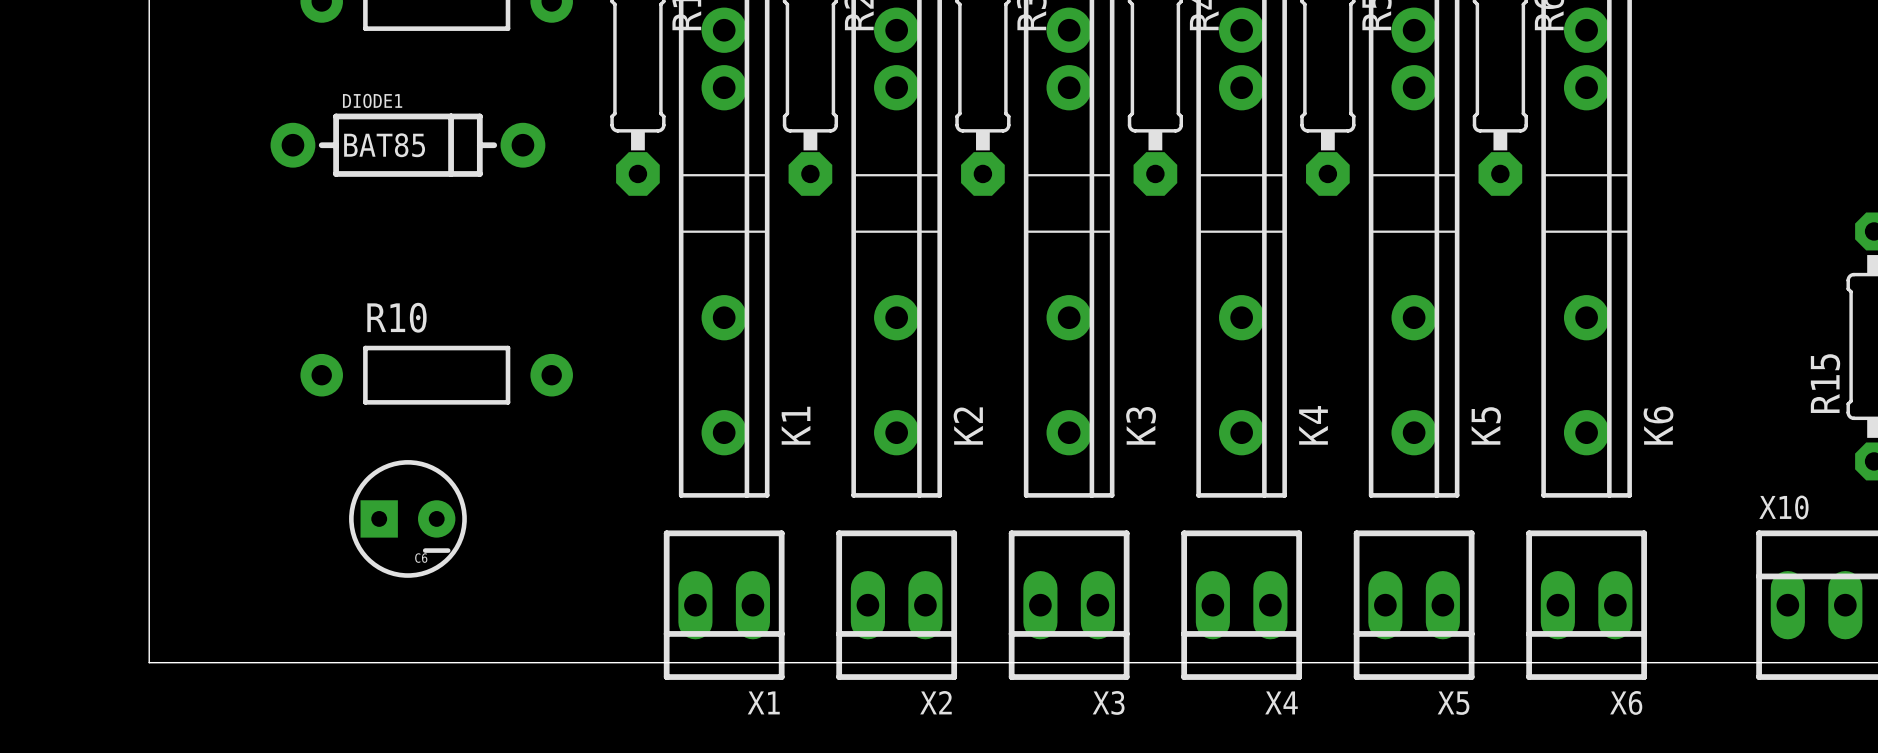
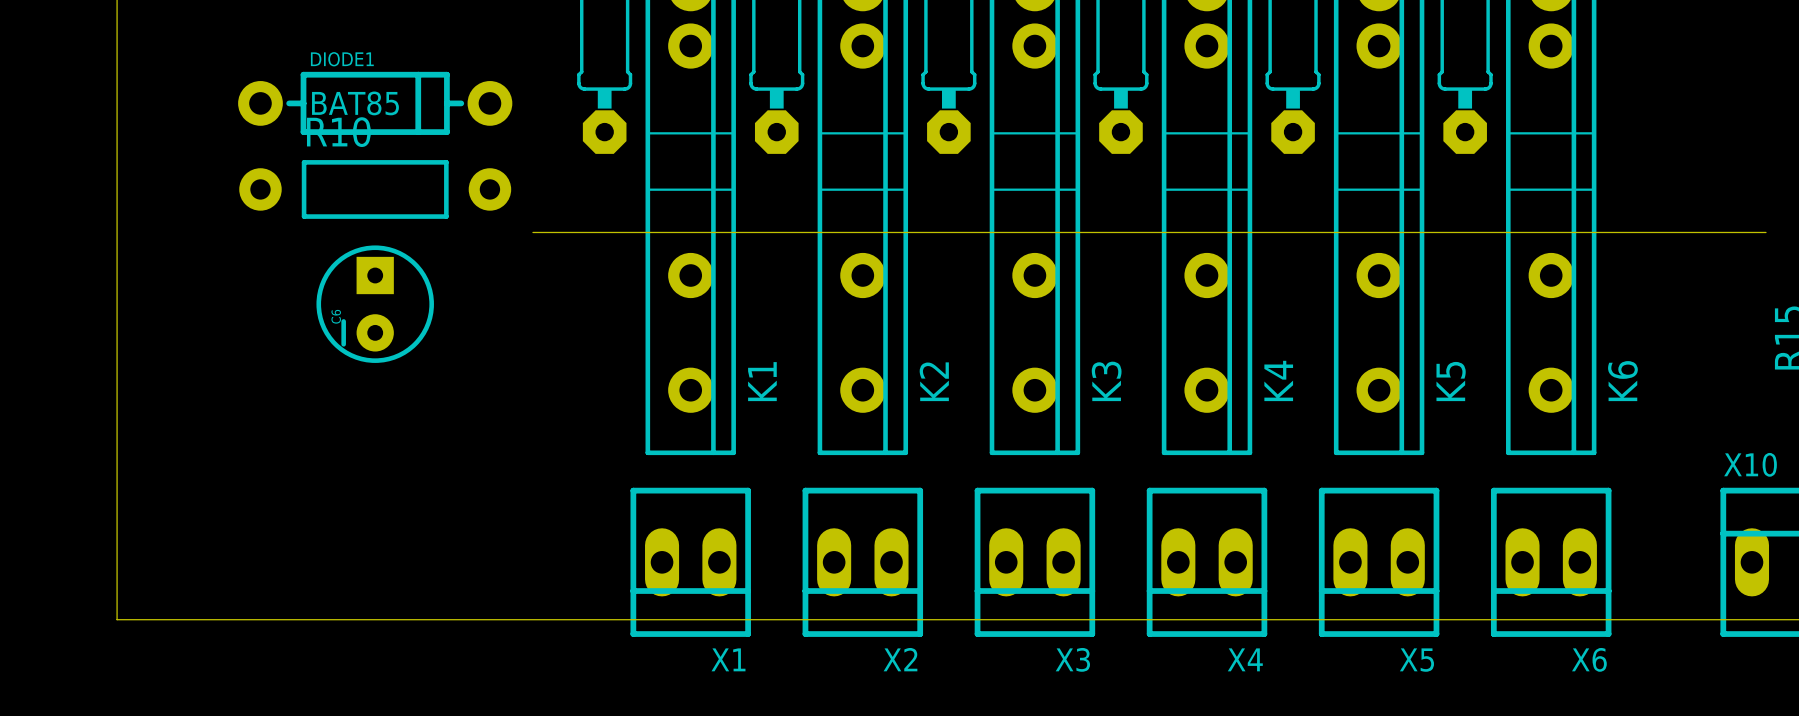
board edge: none -> (532, 232) (1765, 232)
R10 position: (436, 375) -> (375, 189)
C6 rotation: 0° (407, 518) -> 90° clockwise (375, 304)
C6 position: (407, 518) -> (375, 304)

